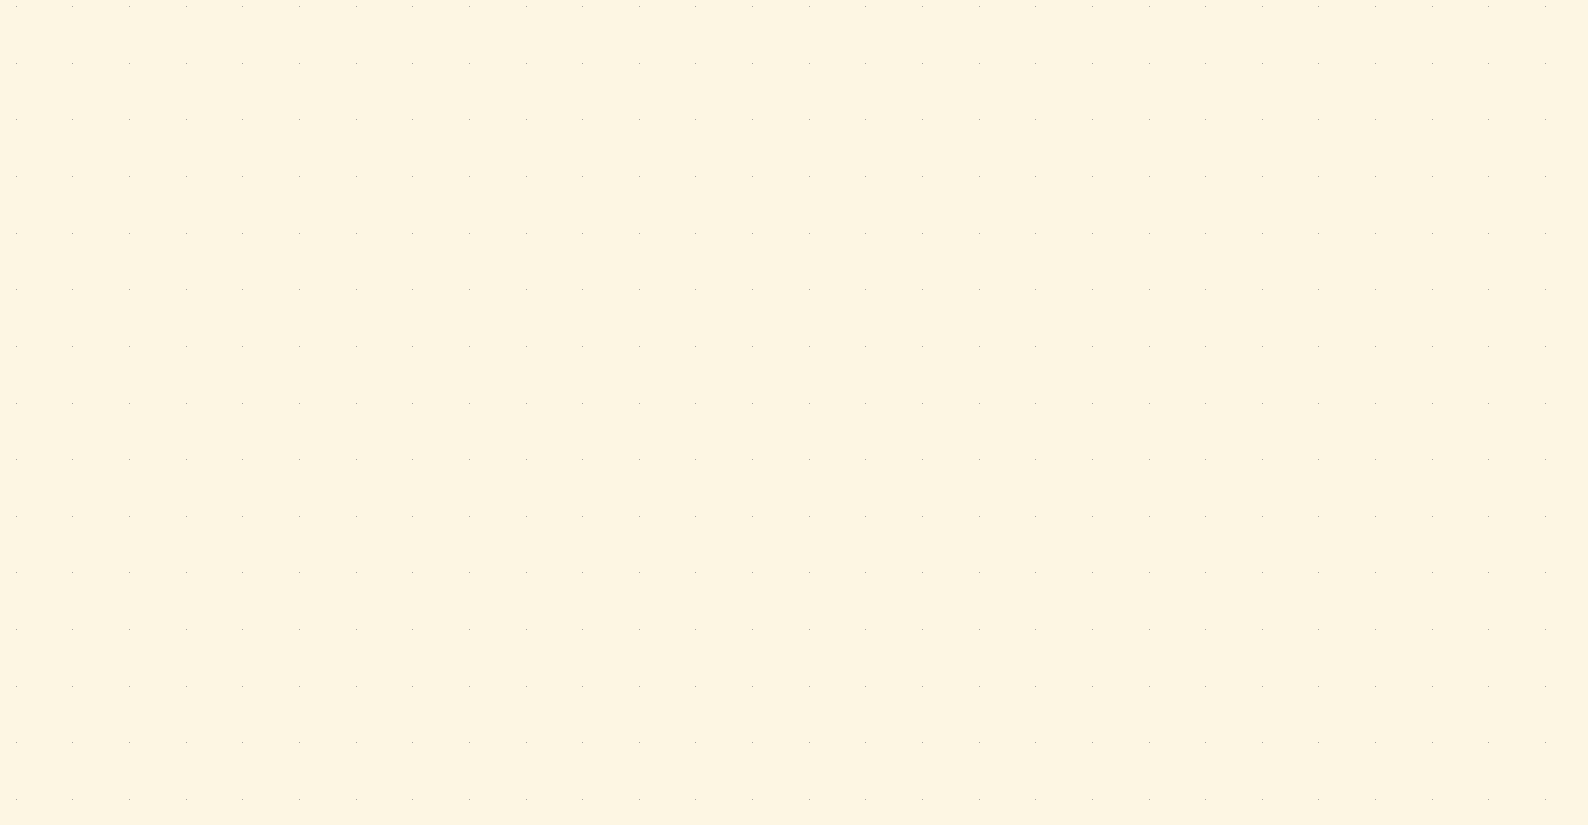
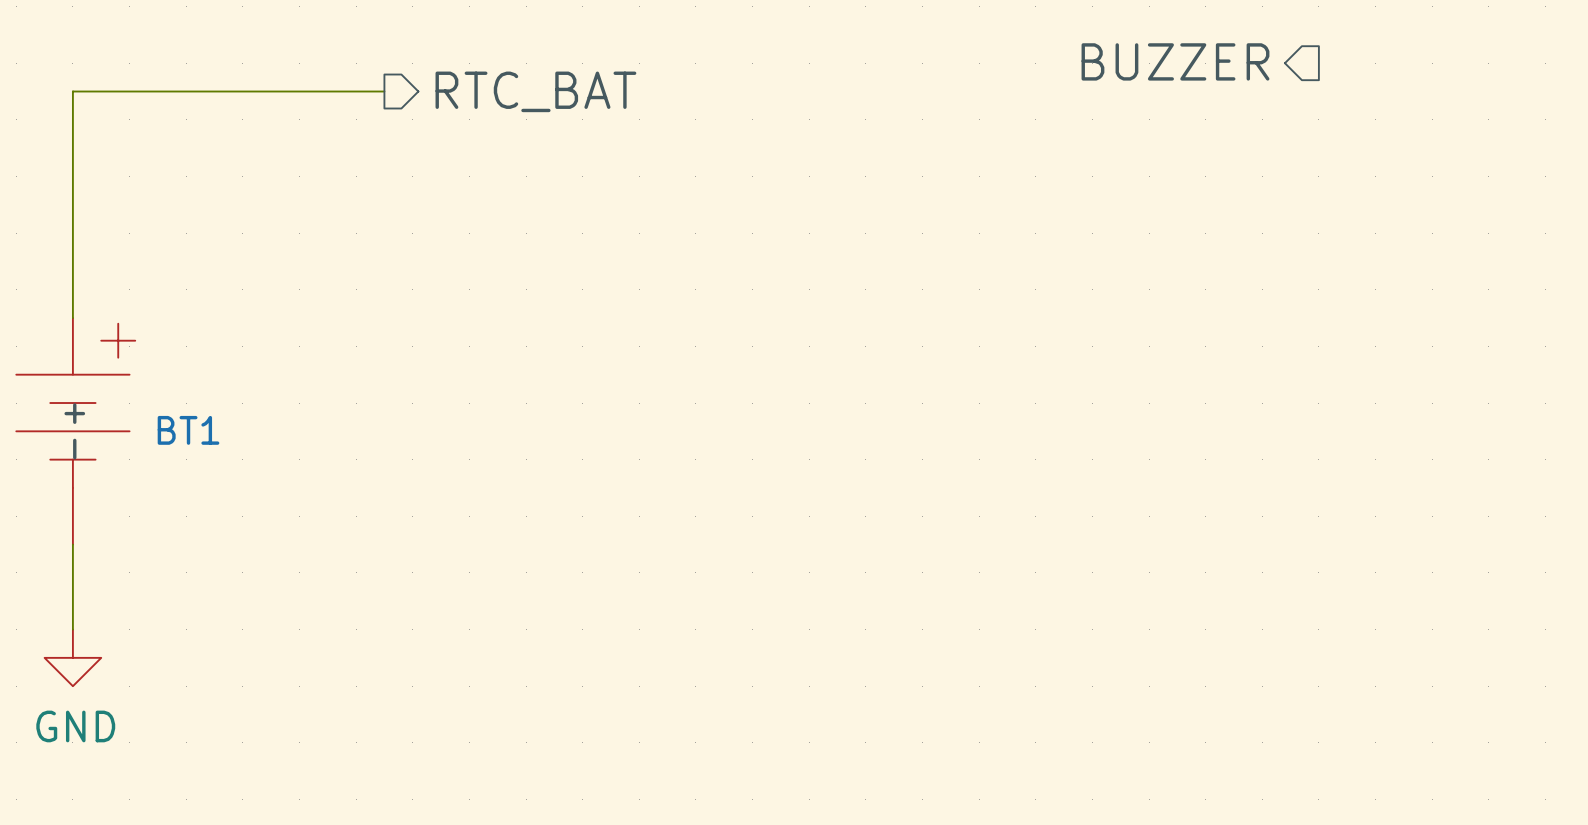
sheet pin: none -> BUZZER (1175, 61)
wire: none -> (384, 91) (72, 91) (72, 318)
sheet pin: none -> RTC_BAT (535, 91)
BT1: none -> (75, 431)
wire: none -> (72, 544) (72, 629)
power symbol: none -> GND (72, 657)

